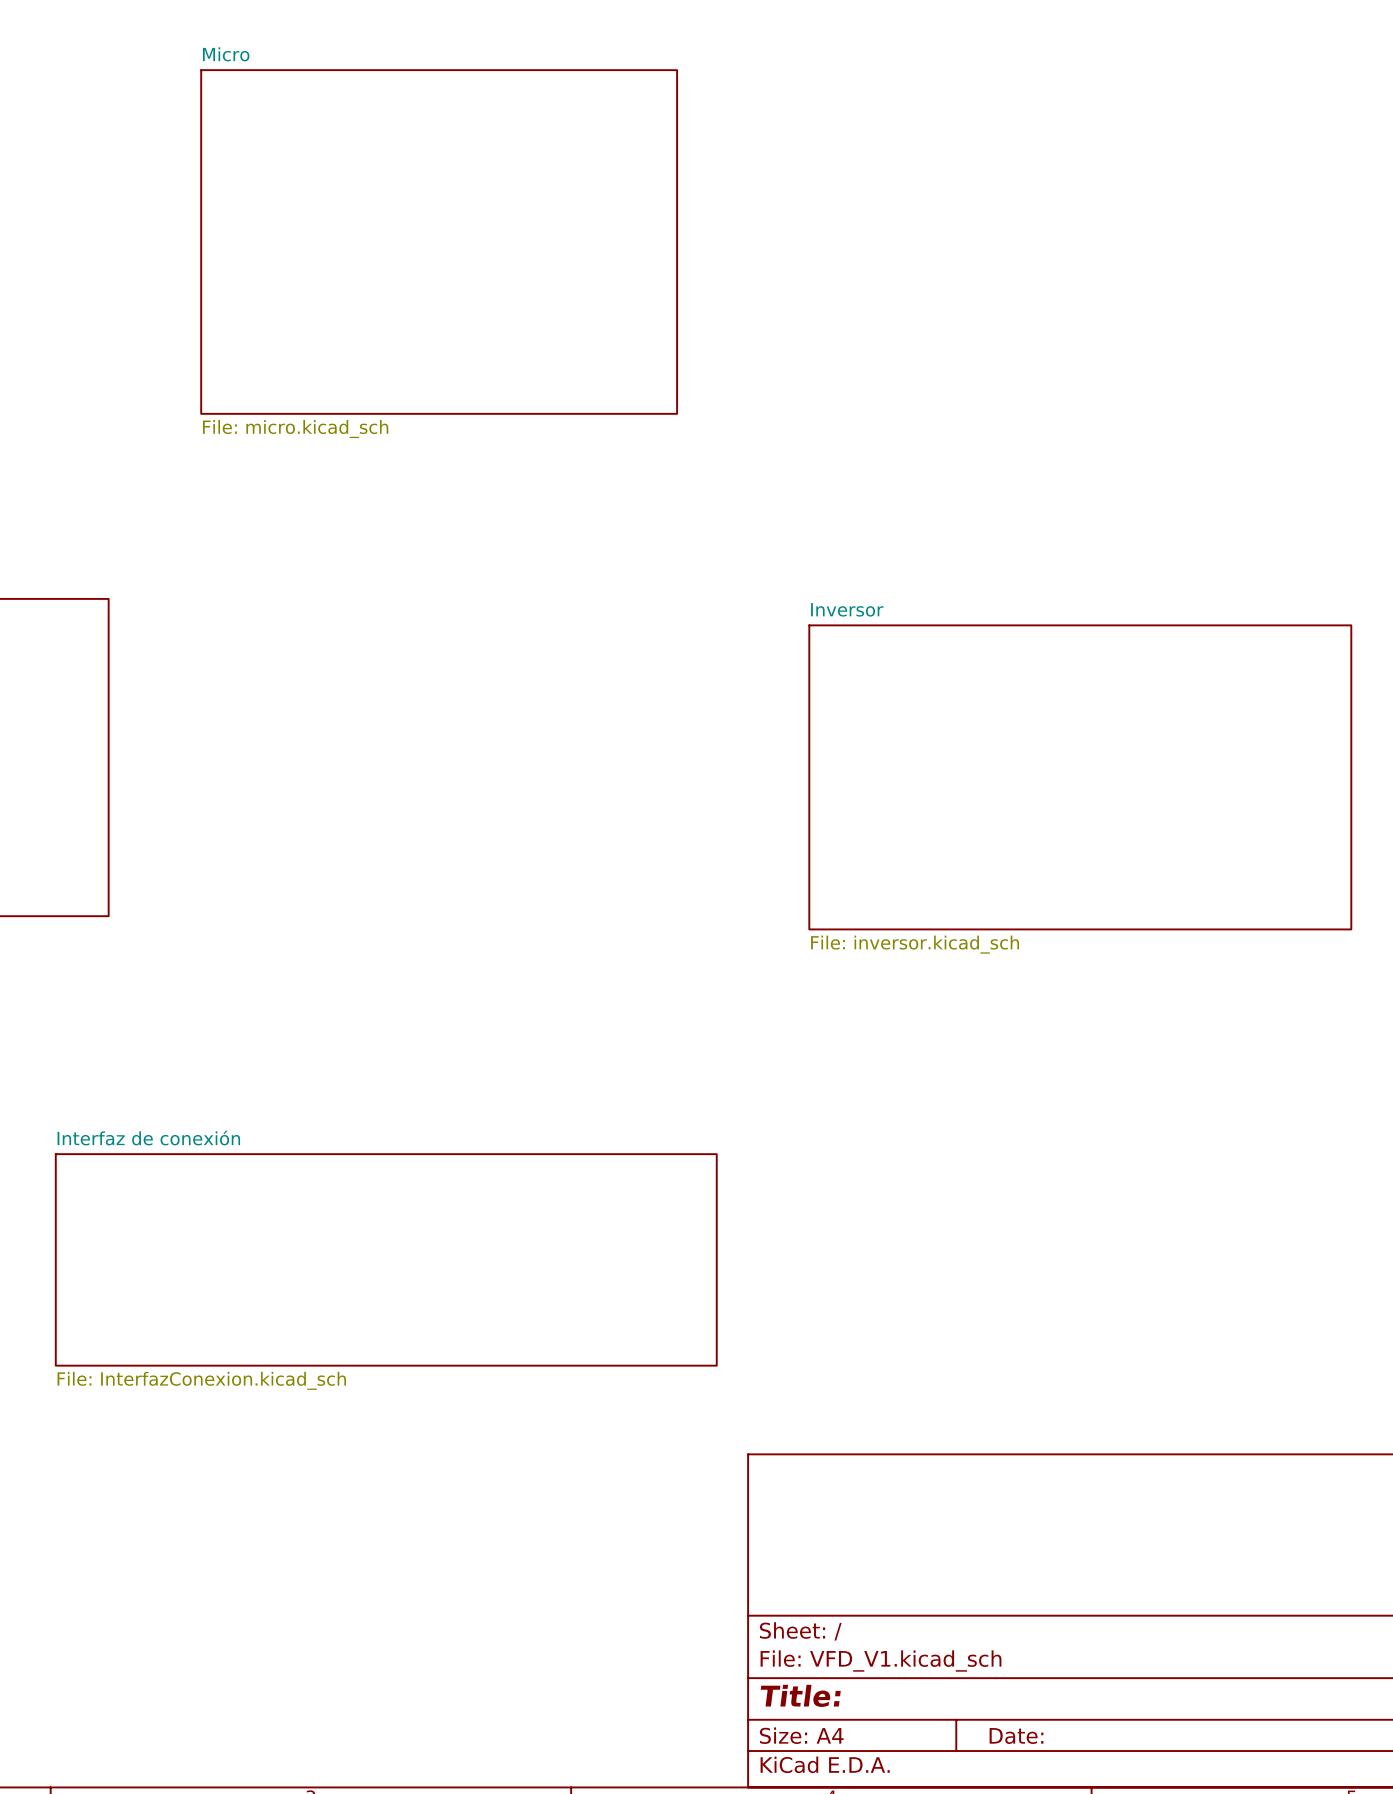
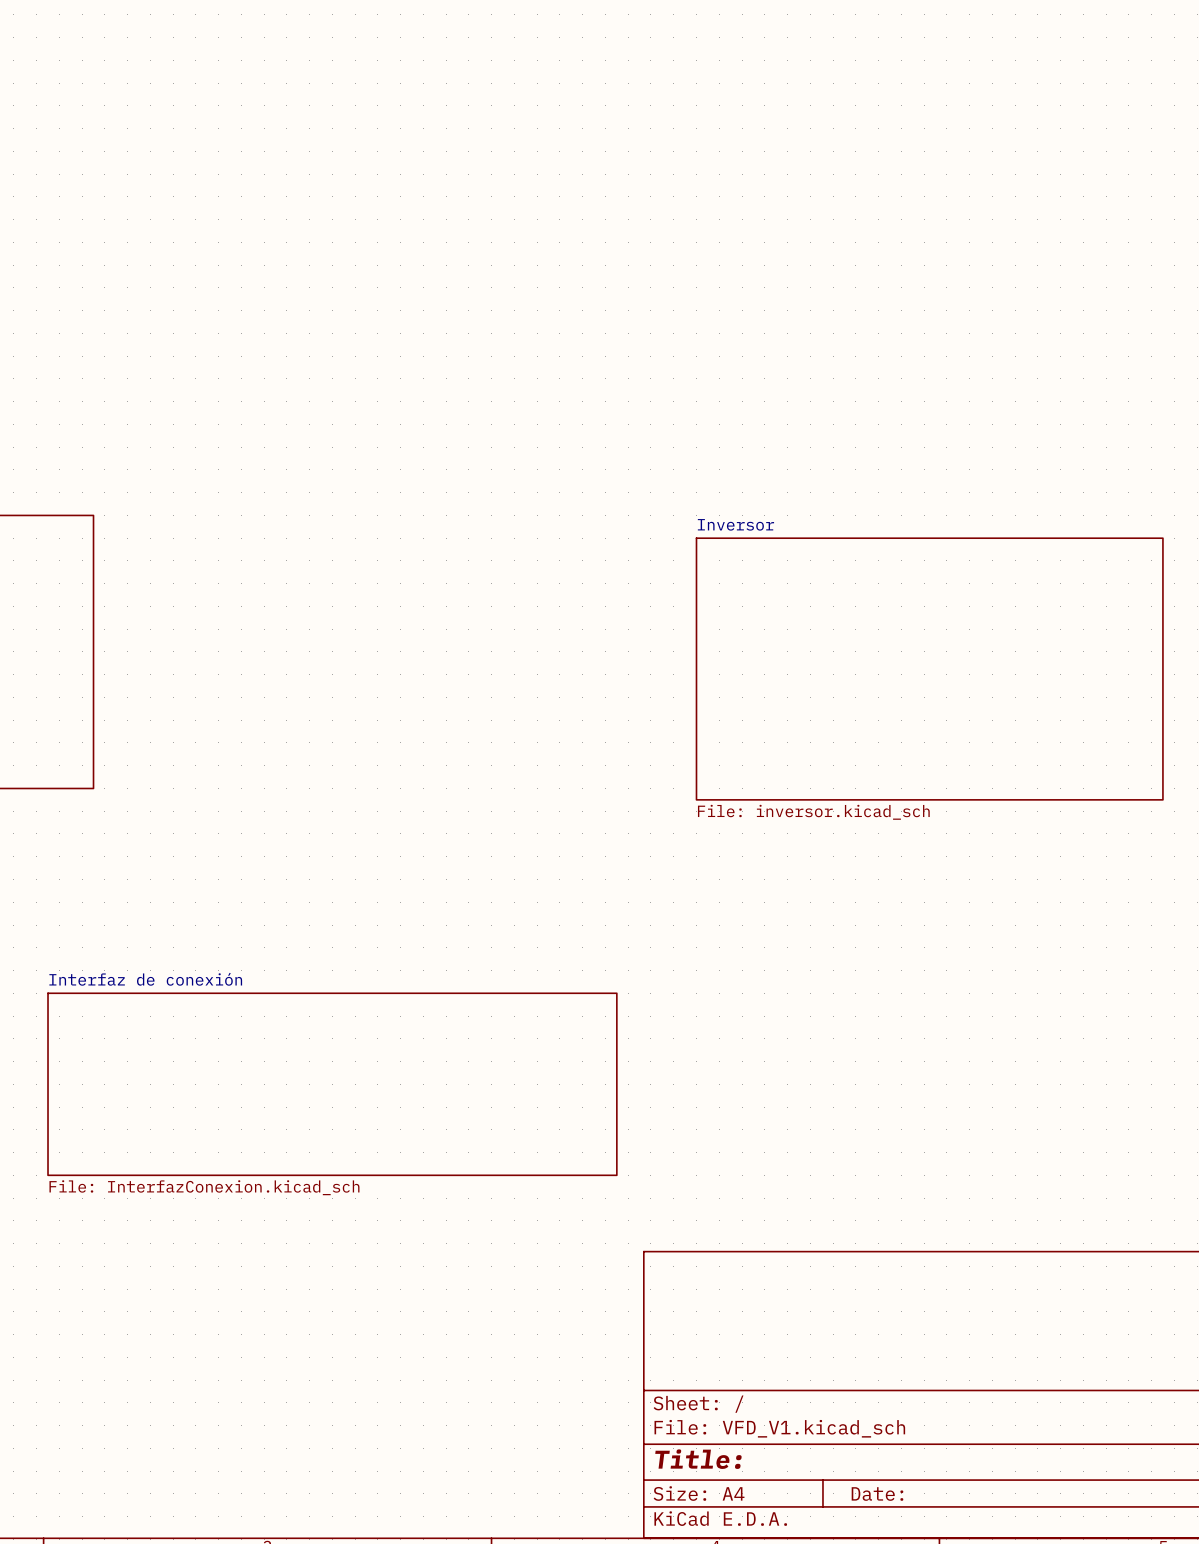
sheet Micro: File: micro.kicad_sch (439, 241) -> none

